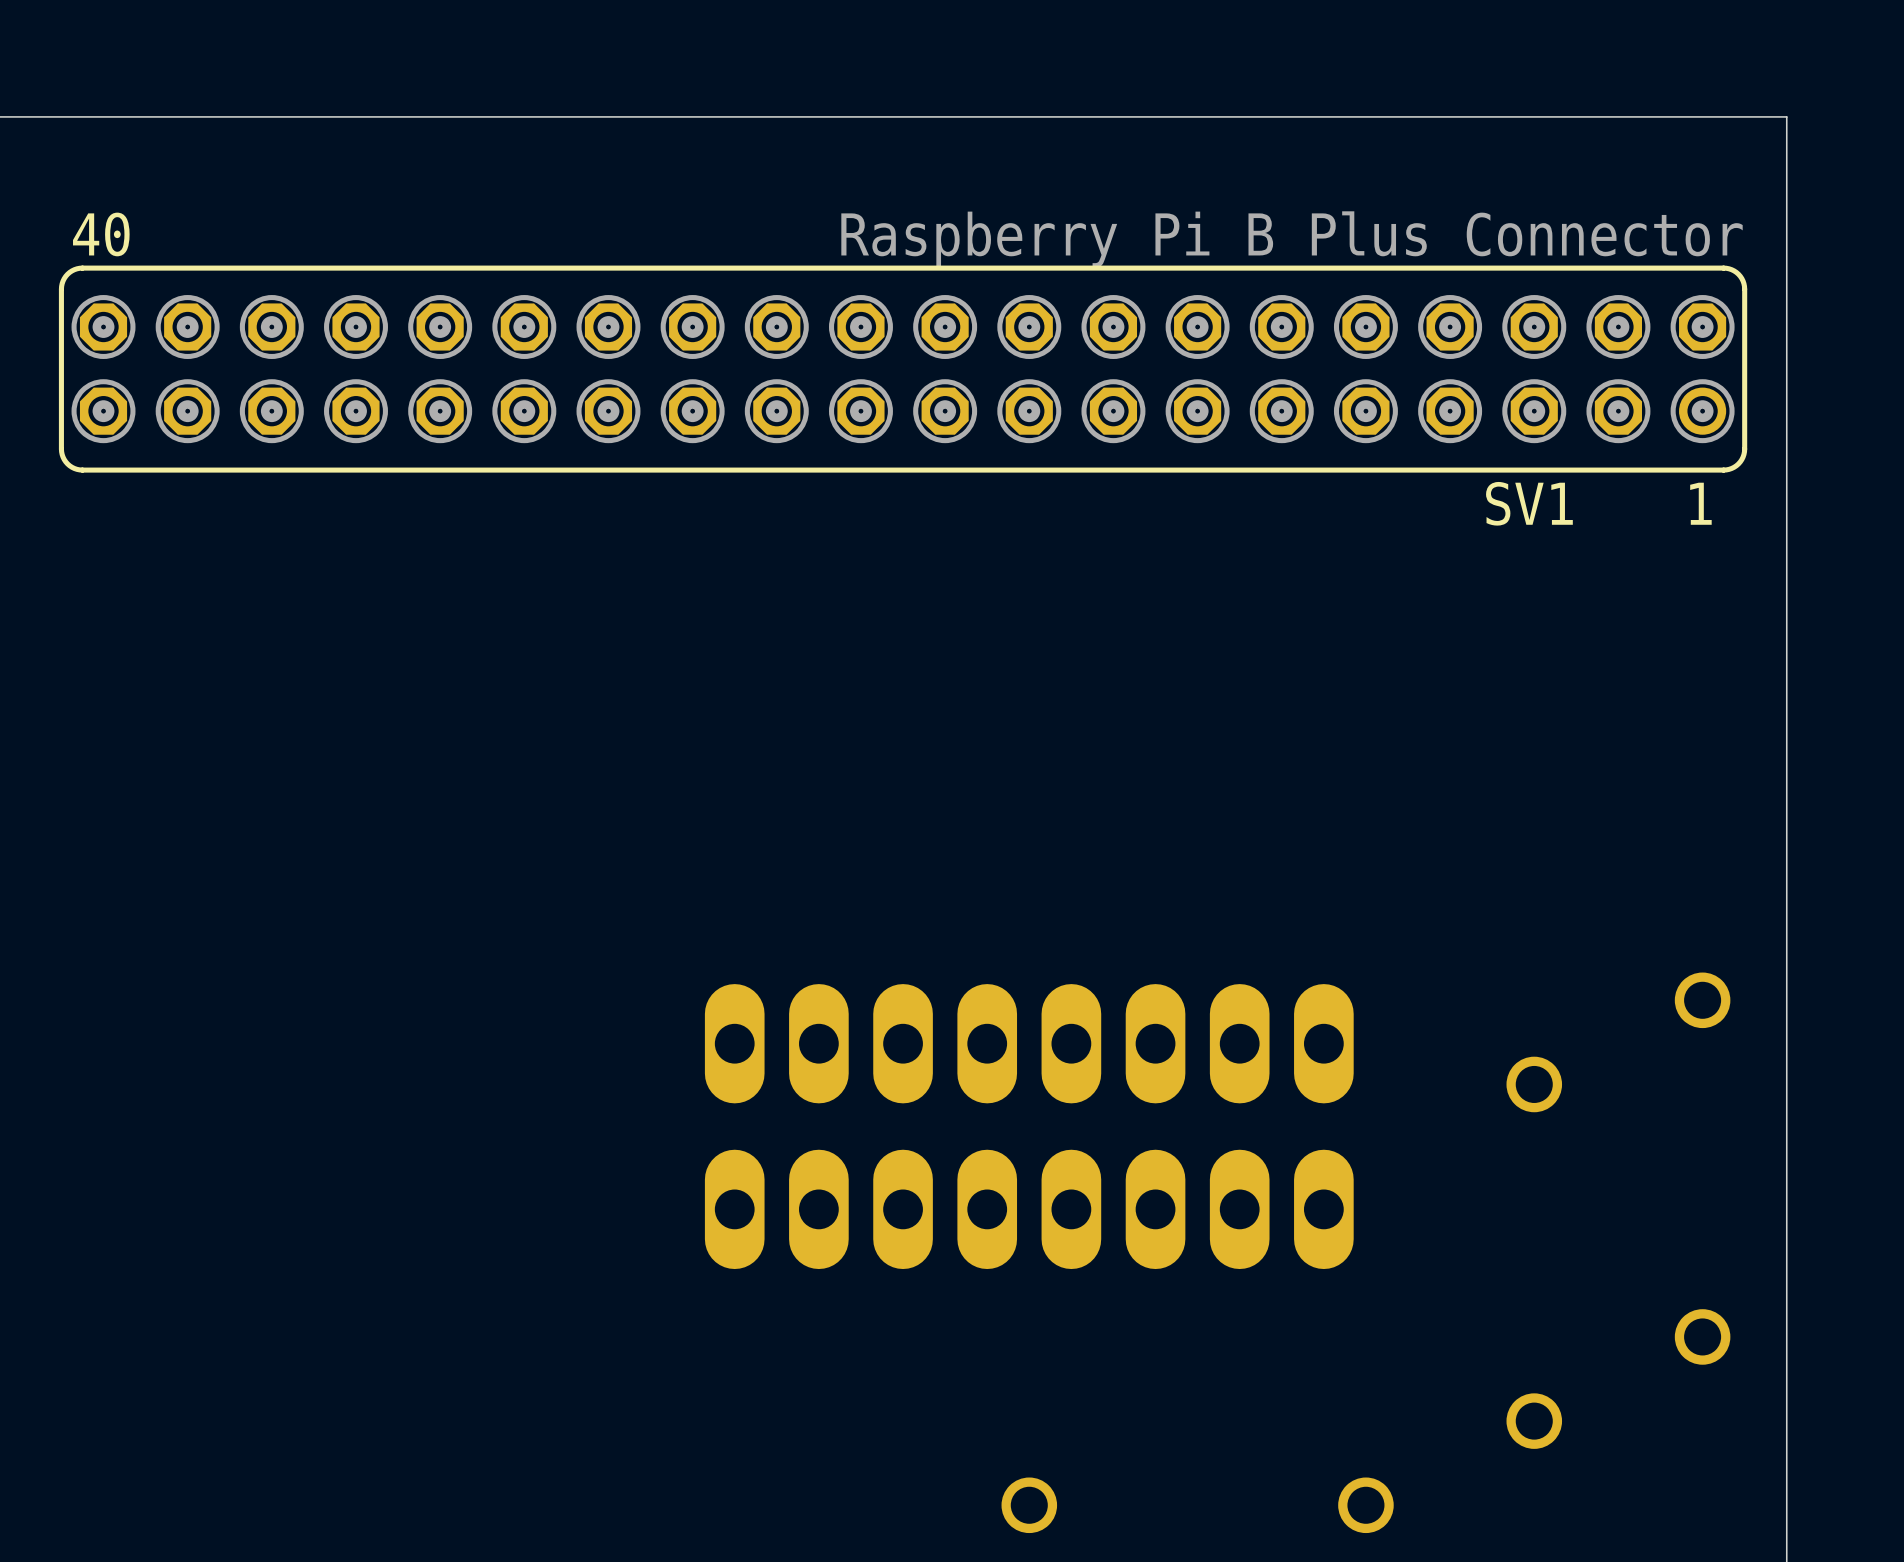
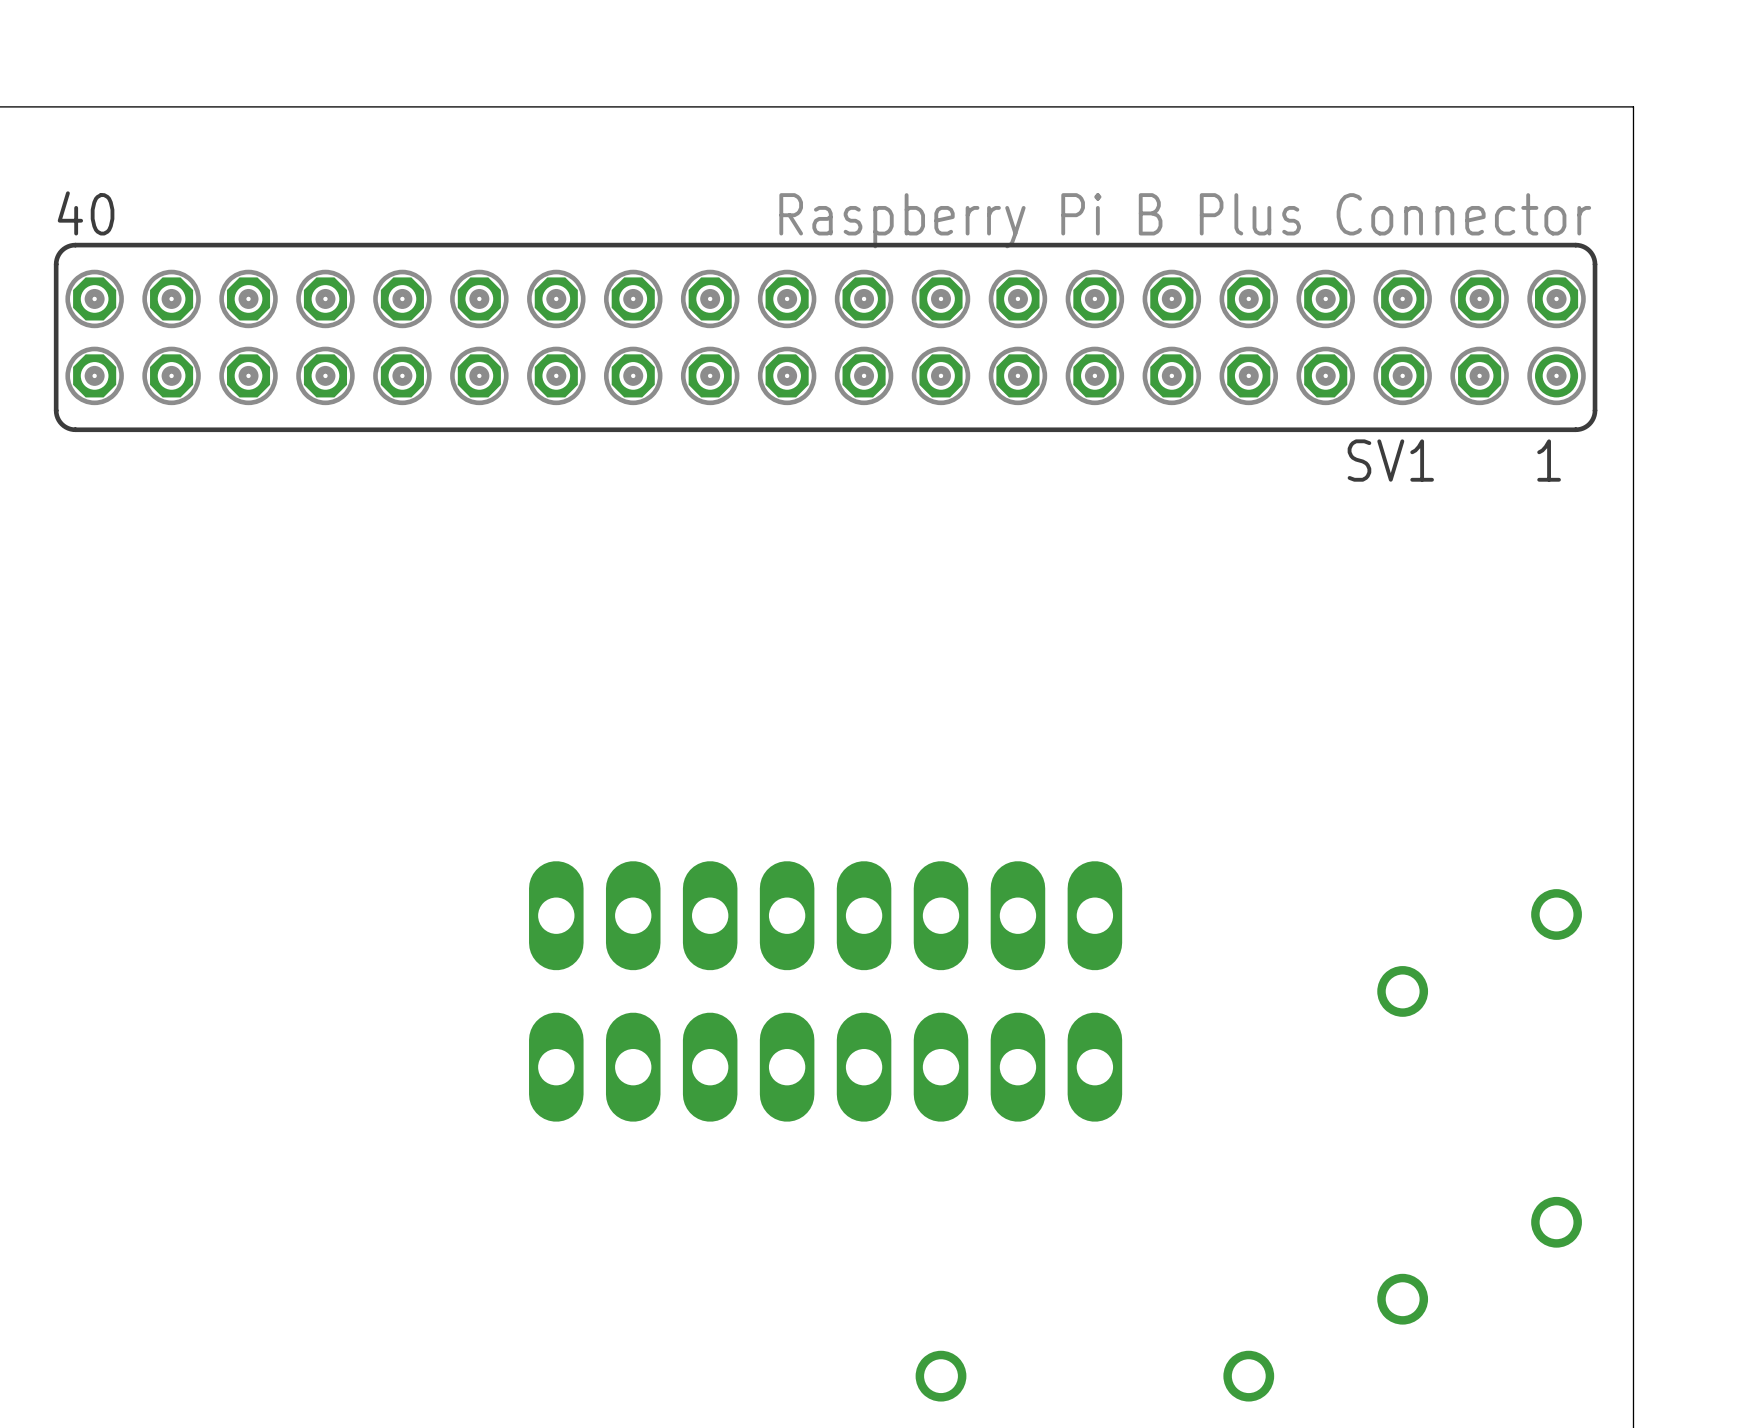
part position: (1029, 1126) -> (825, 991)

